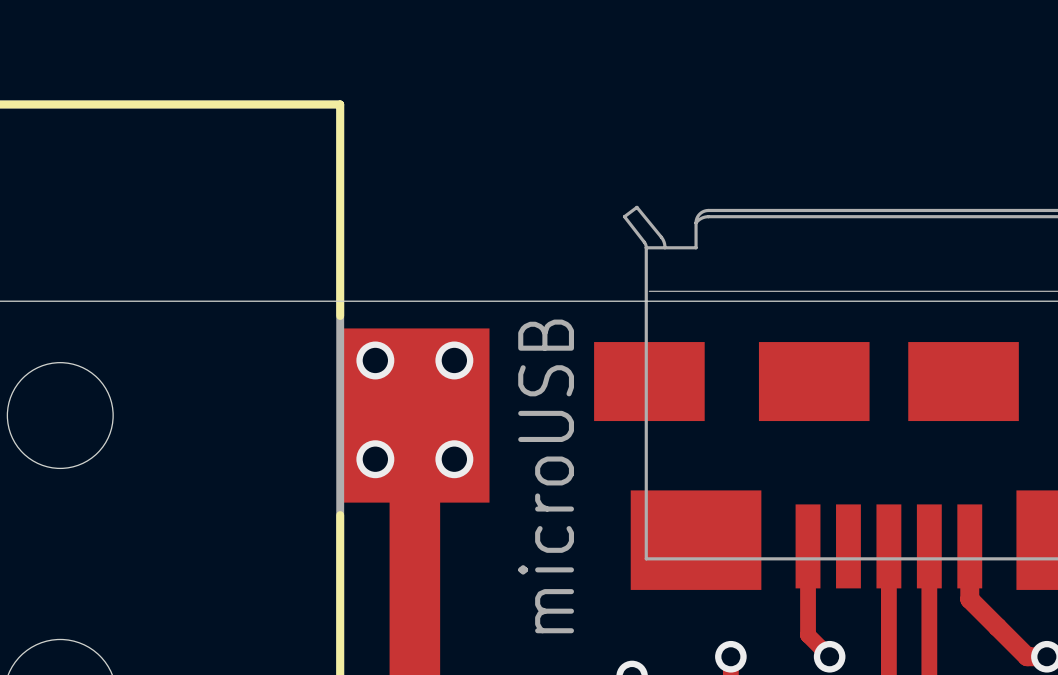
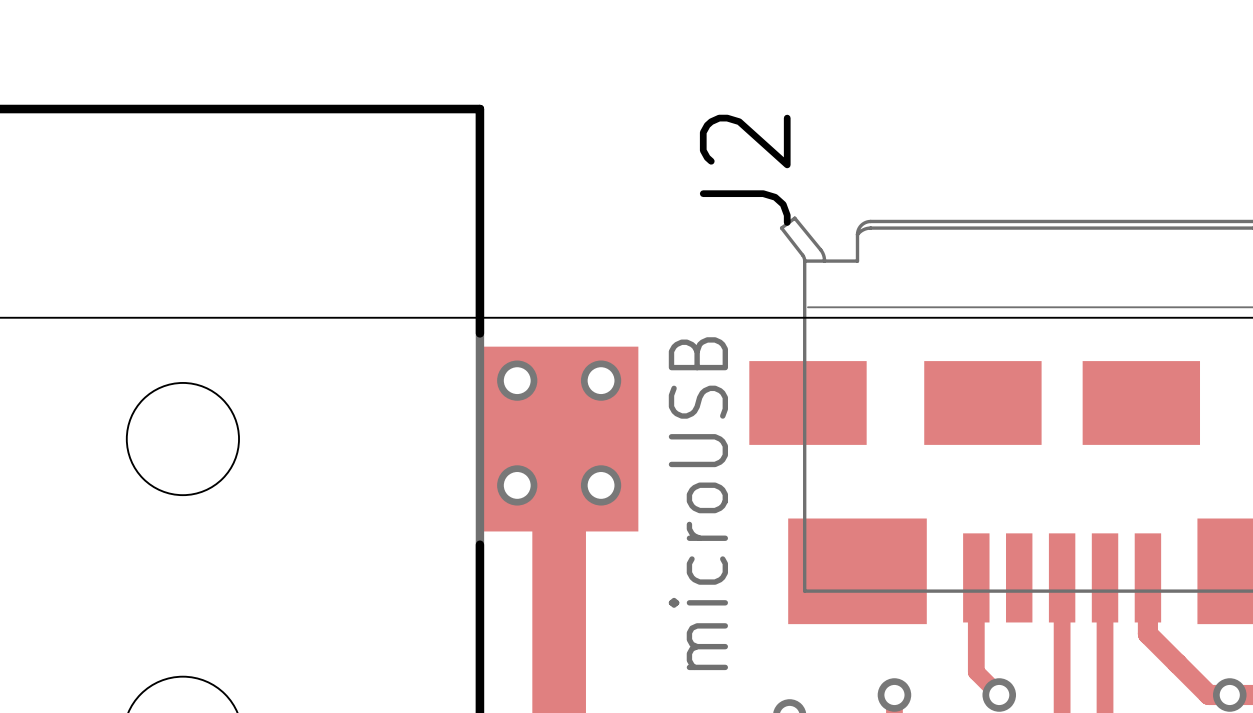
J2 name: none -> J2 (745, 170)

